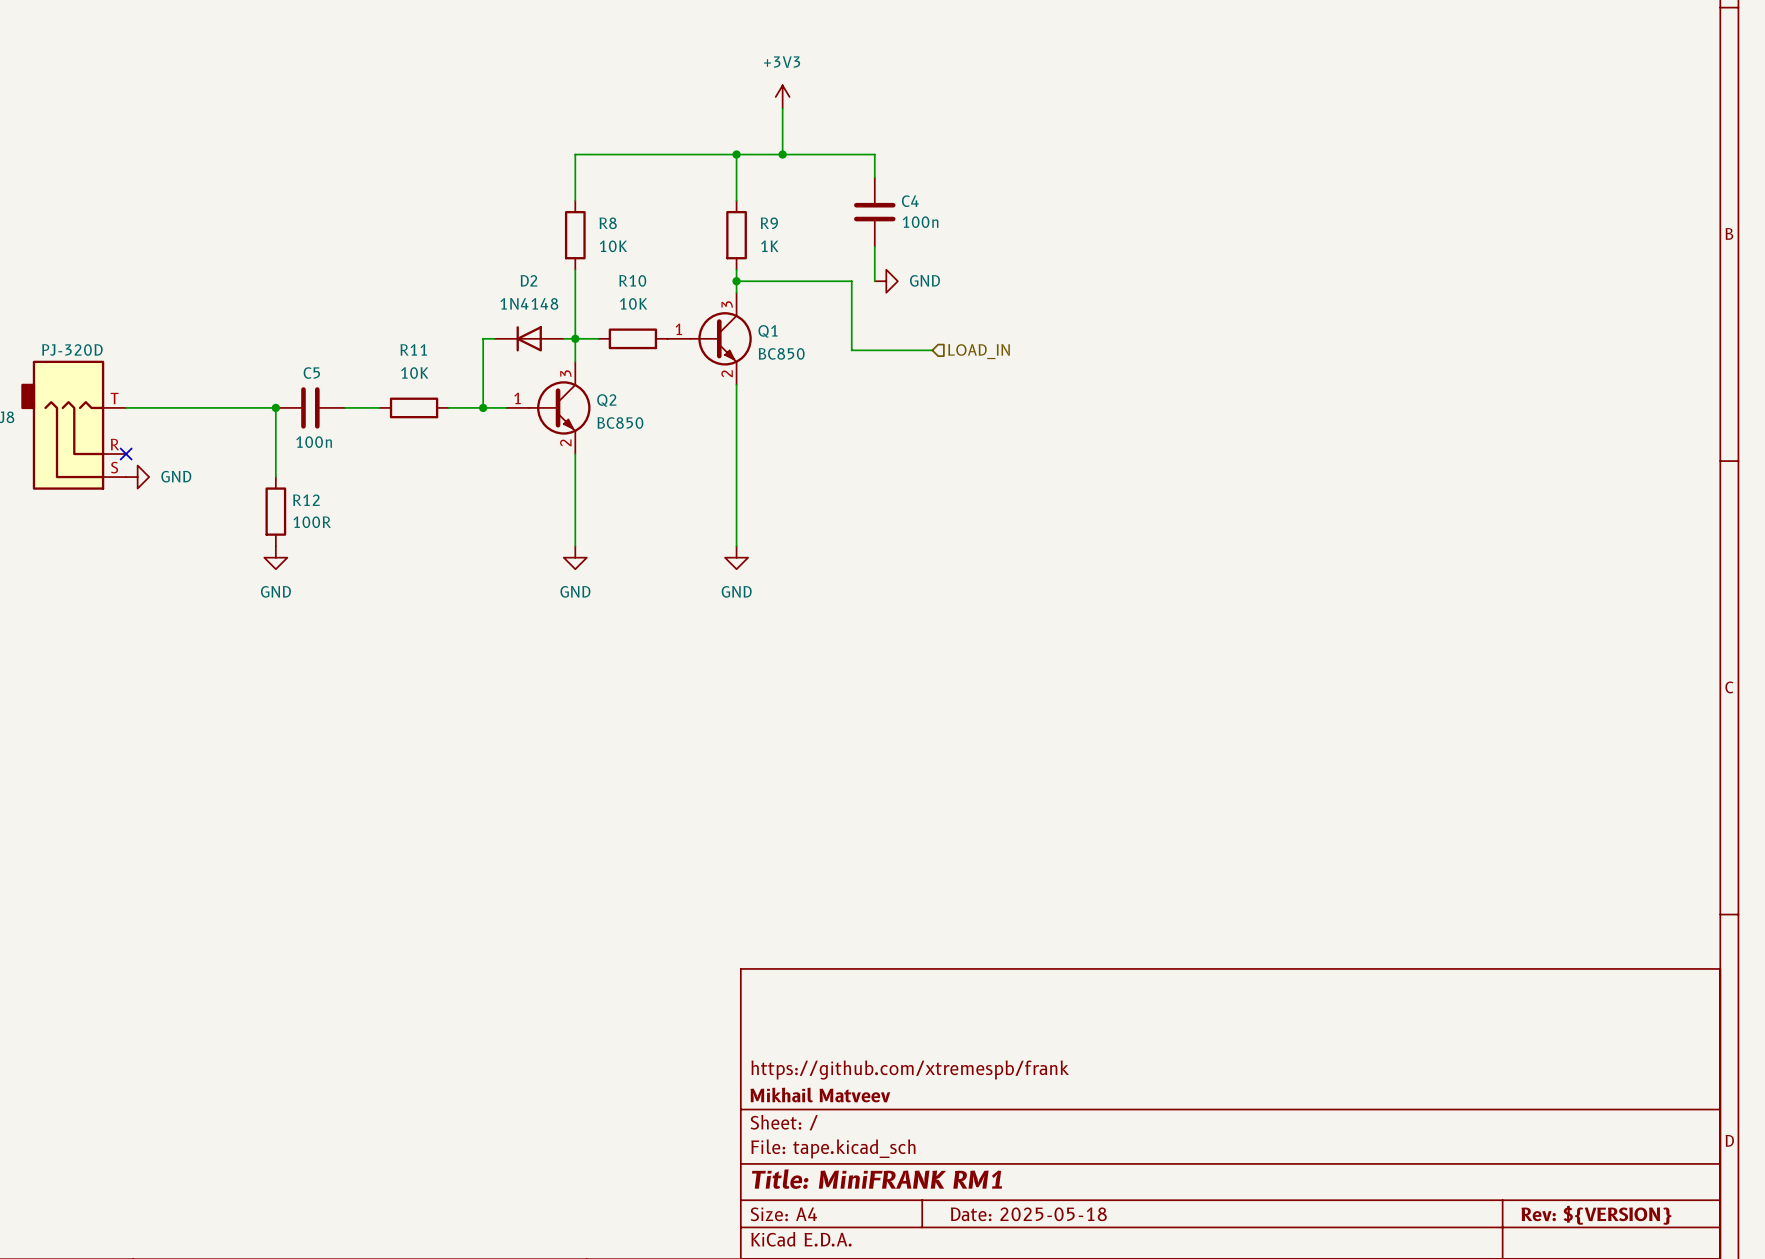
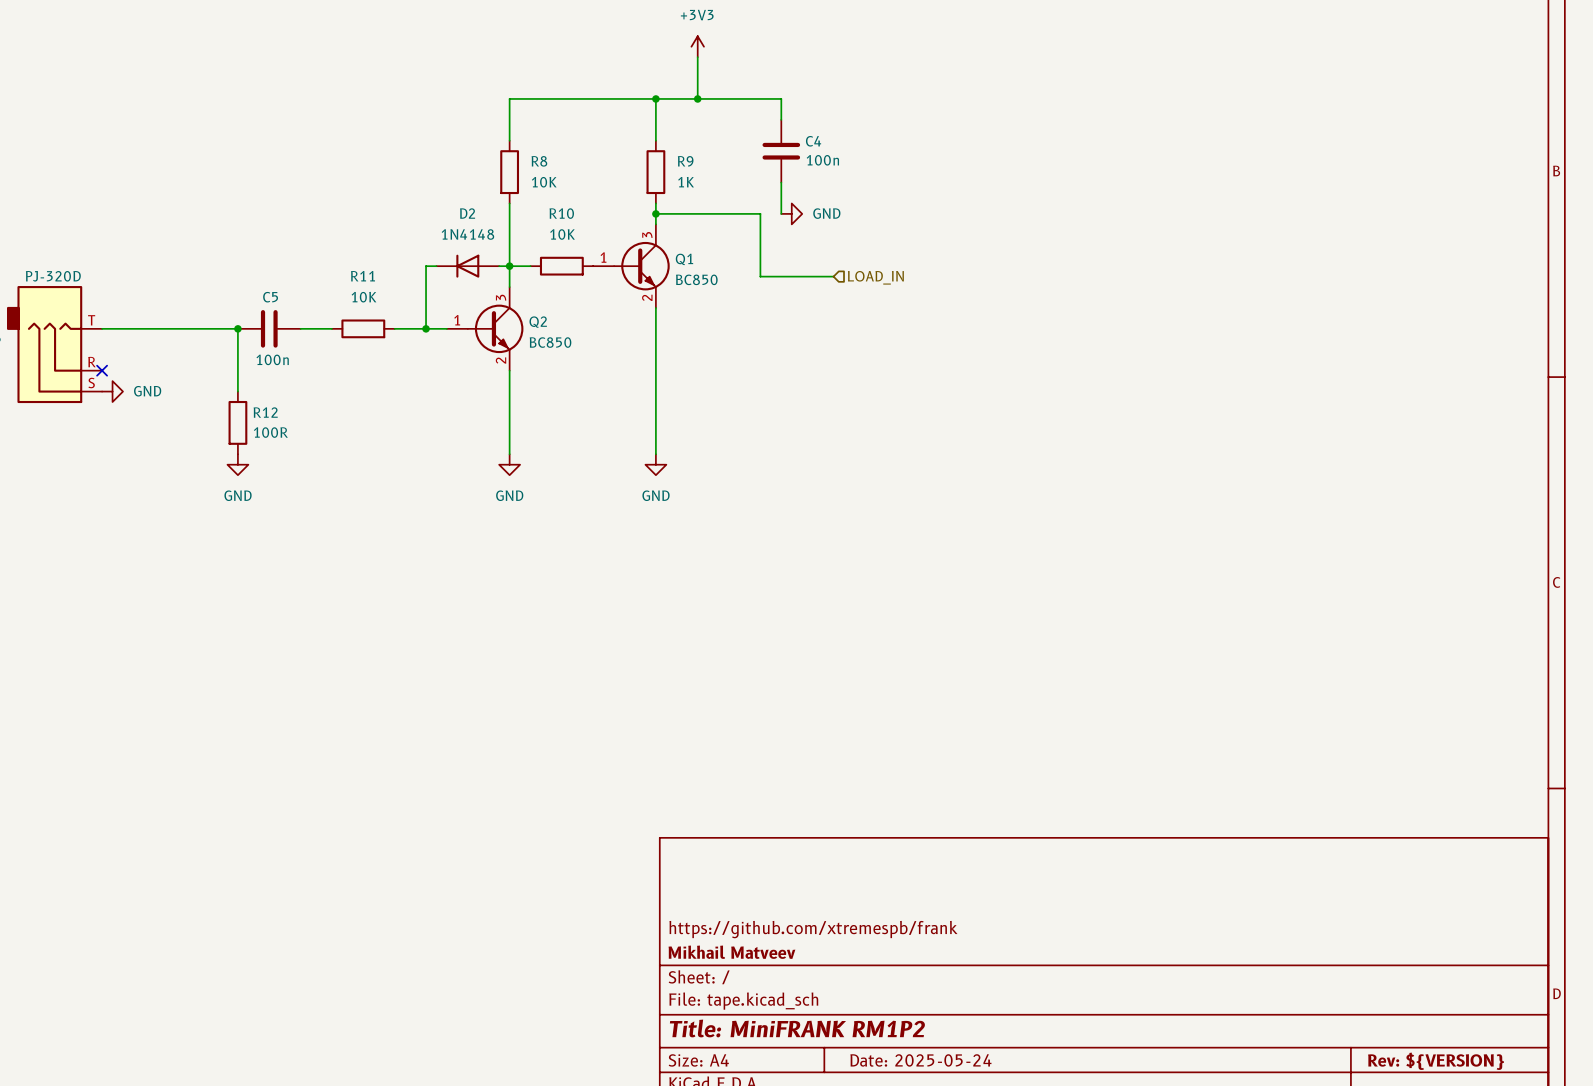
title block: Title: MiniFRANK RM1 (877, 1179) -> Title: MiniFRANK RM1P2 (797, 1028)
title block: Date: 2025-05-18 (1028, 1214) -> Date: 2025-05-24 (920, 1060)

